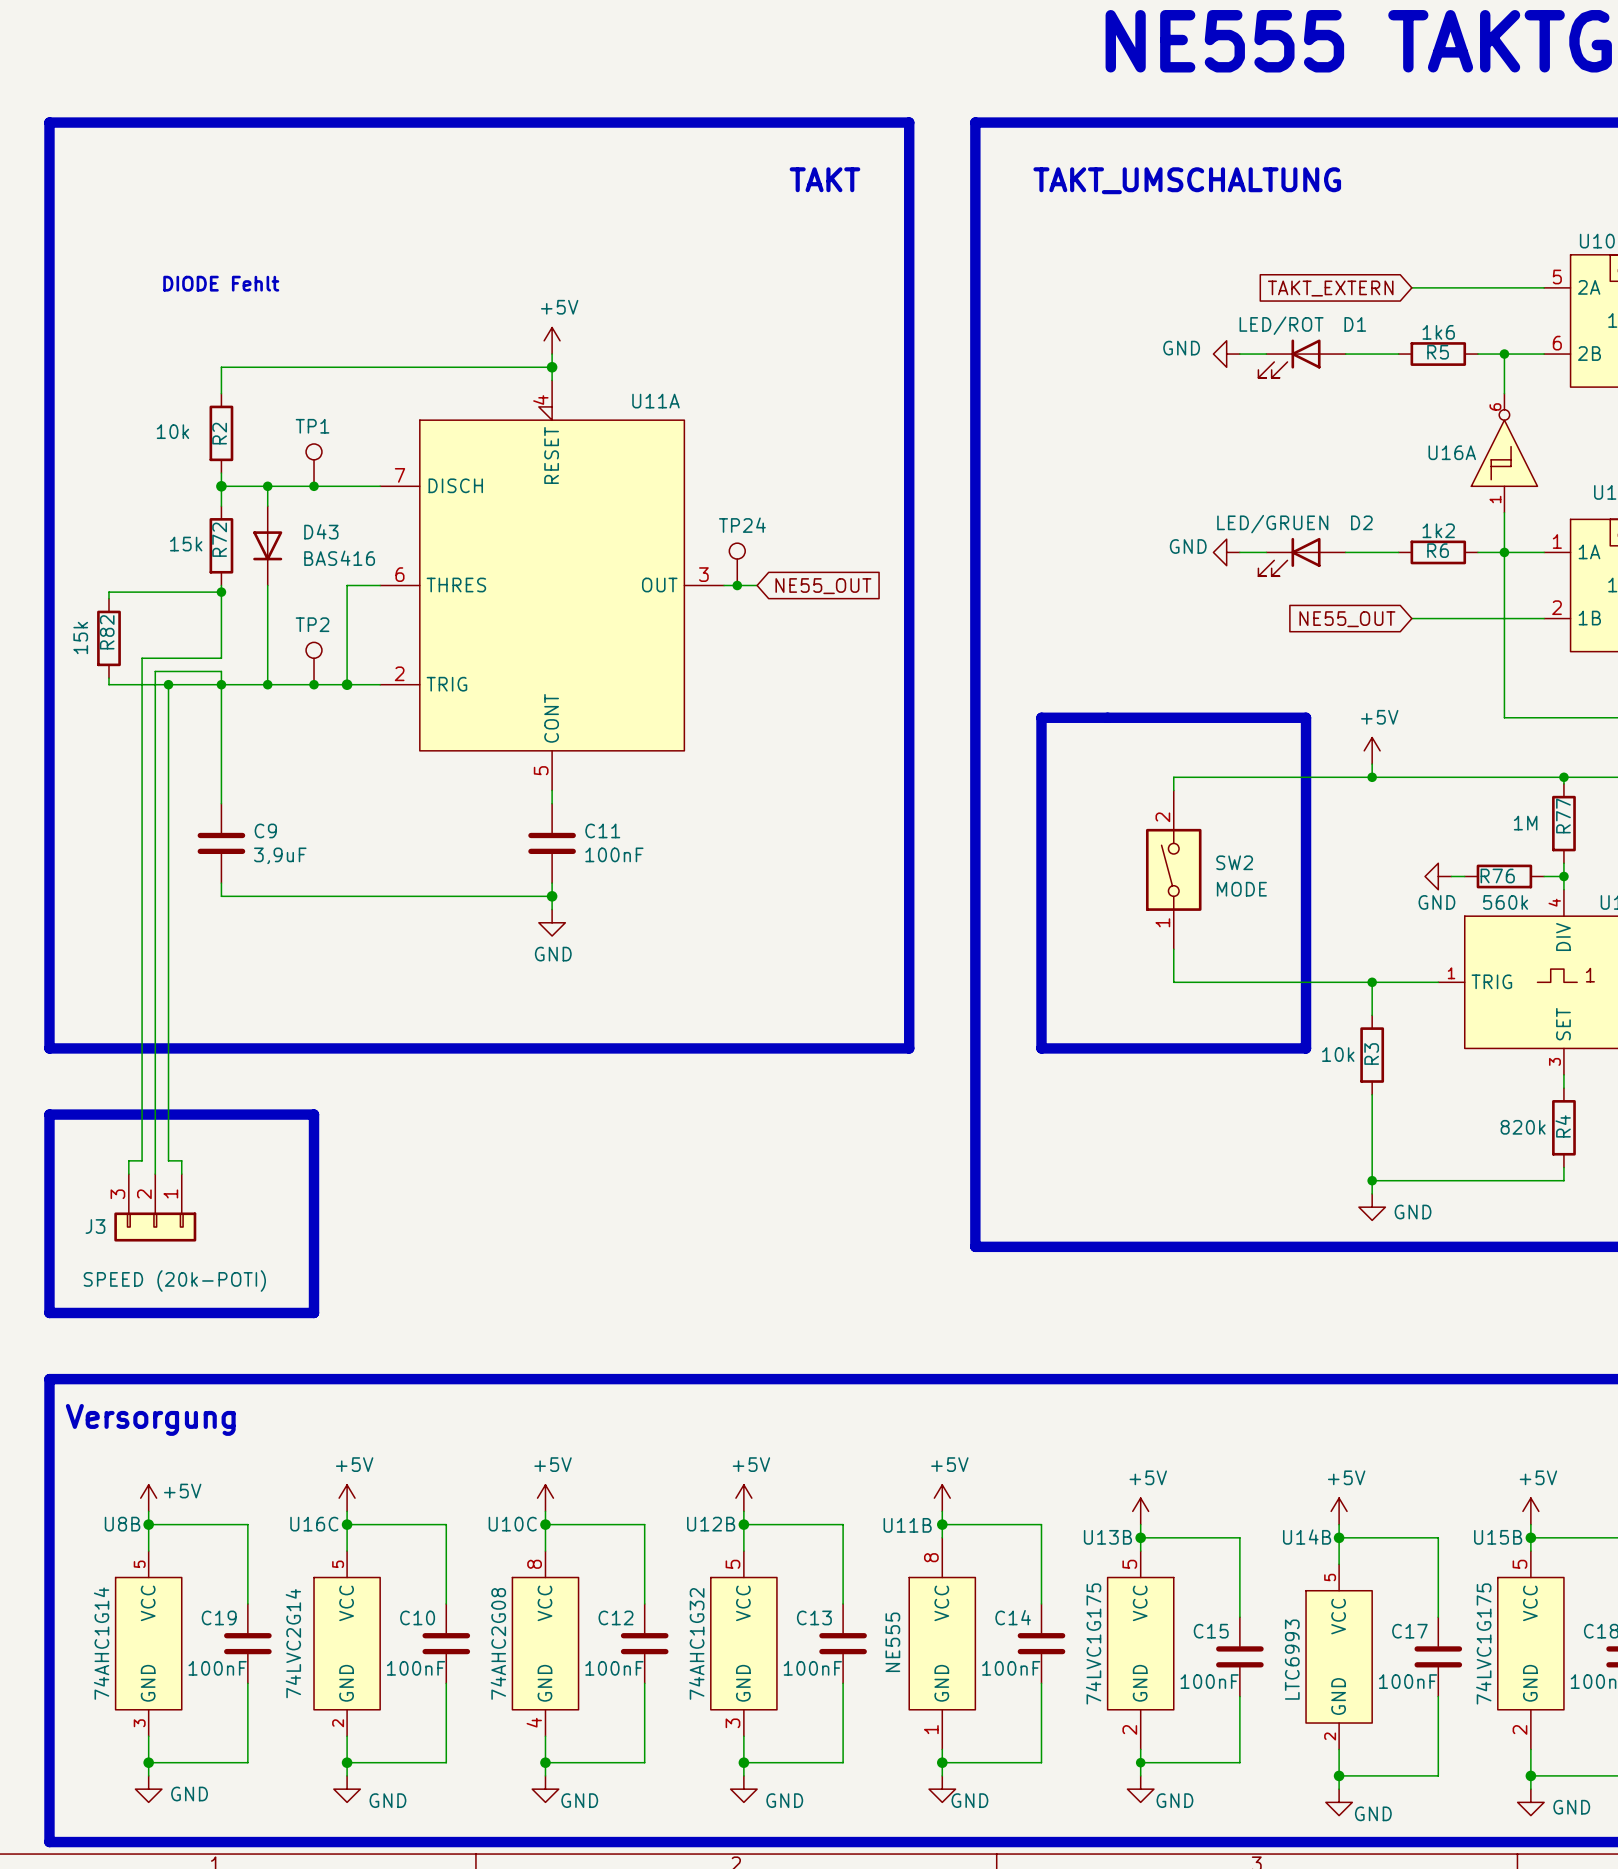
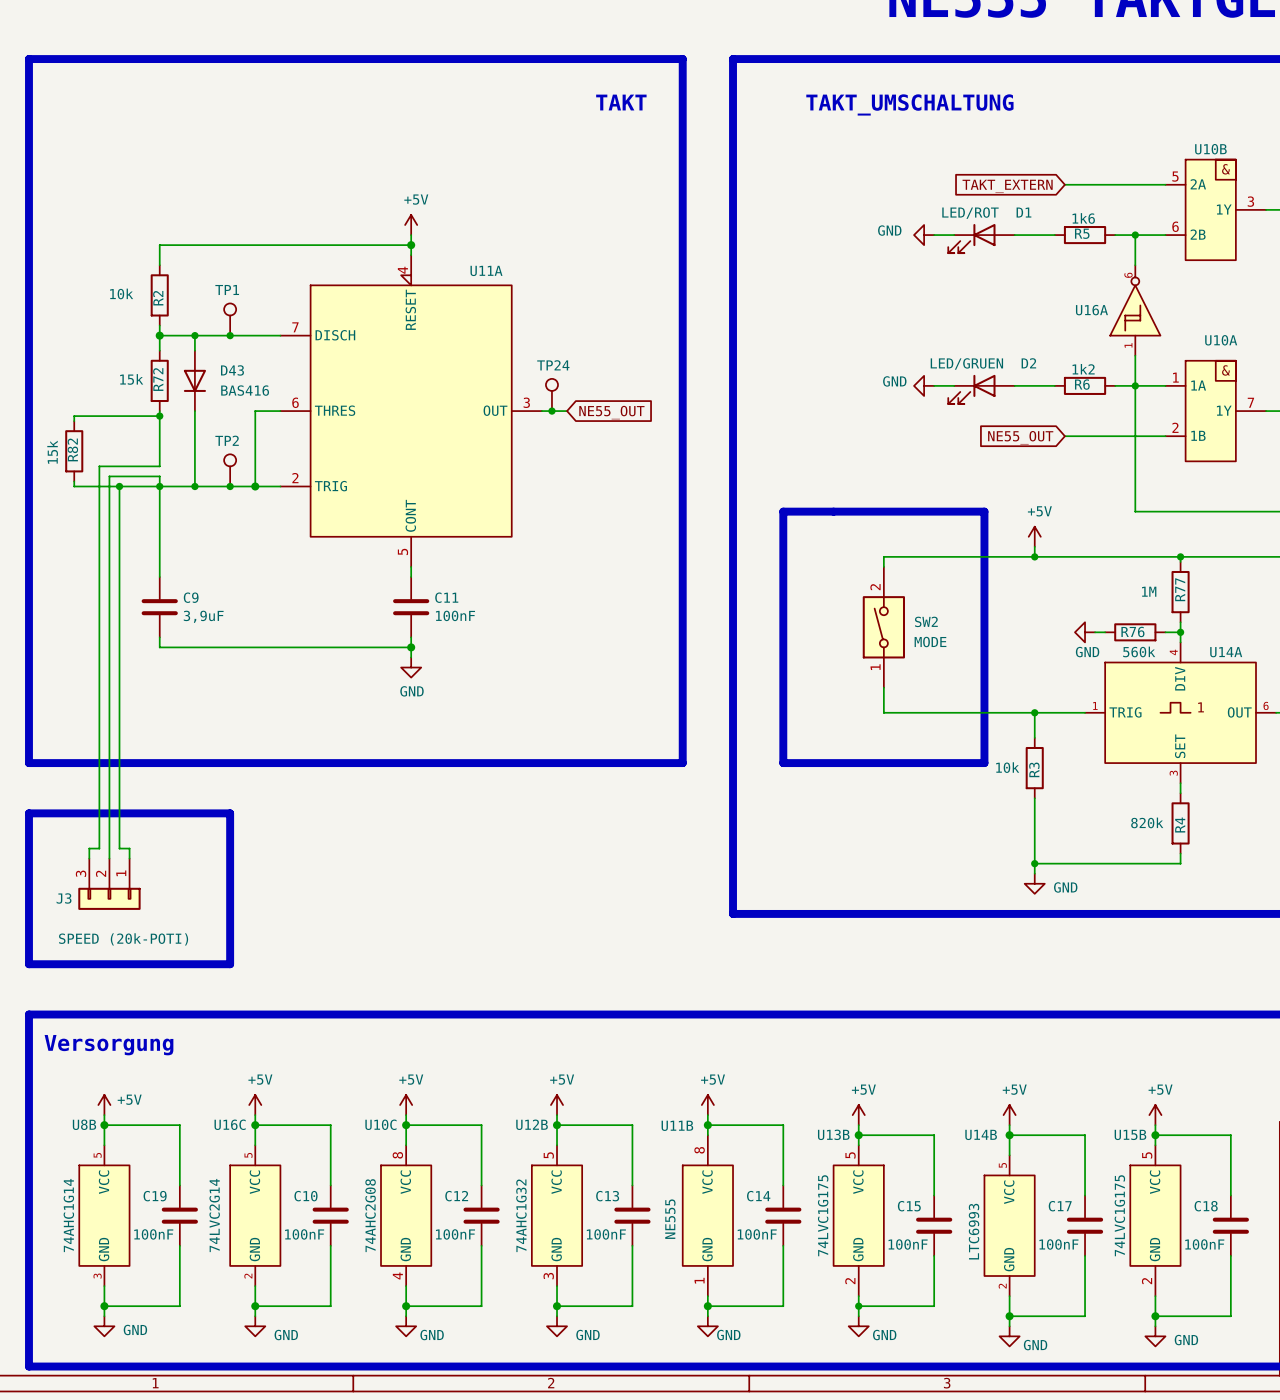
text: DIODE Fehlt (221, 283) -> none

